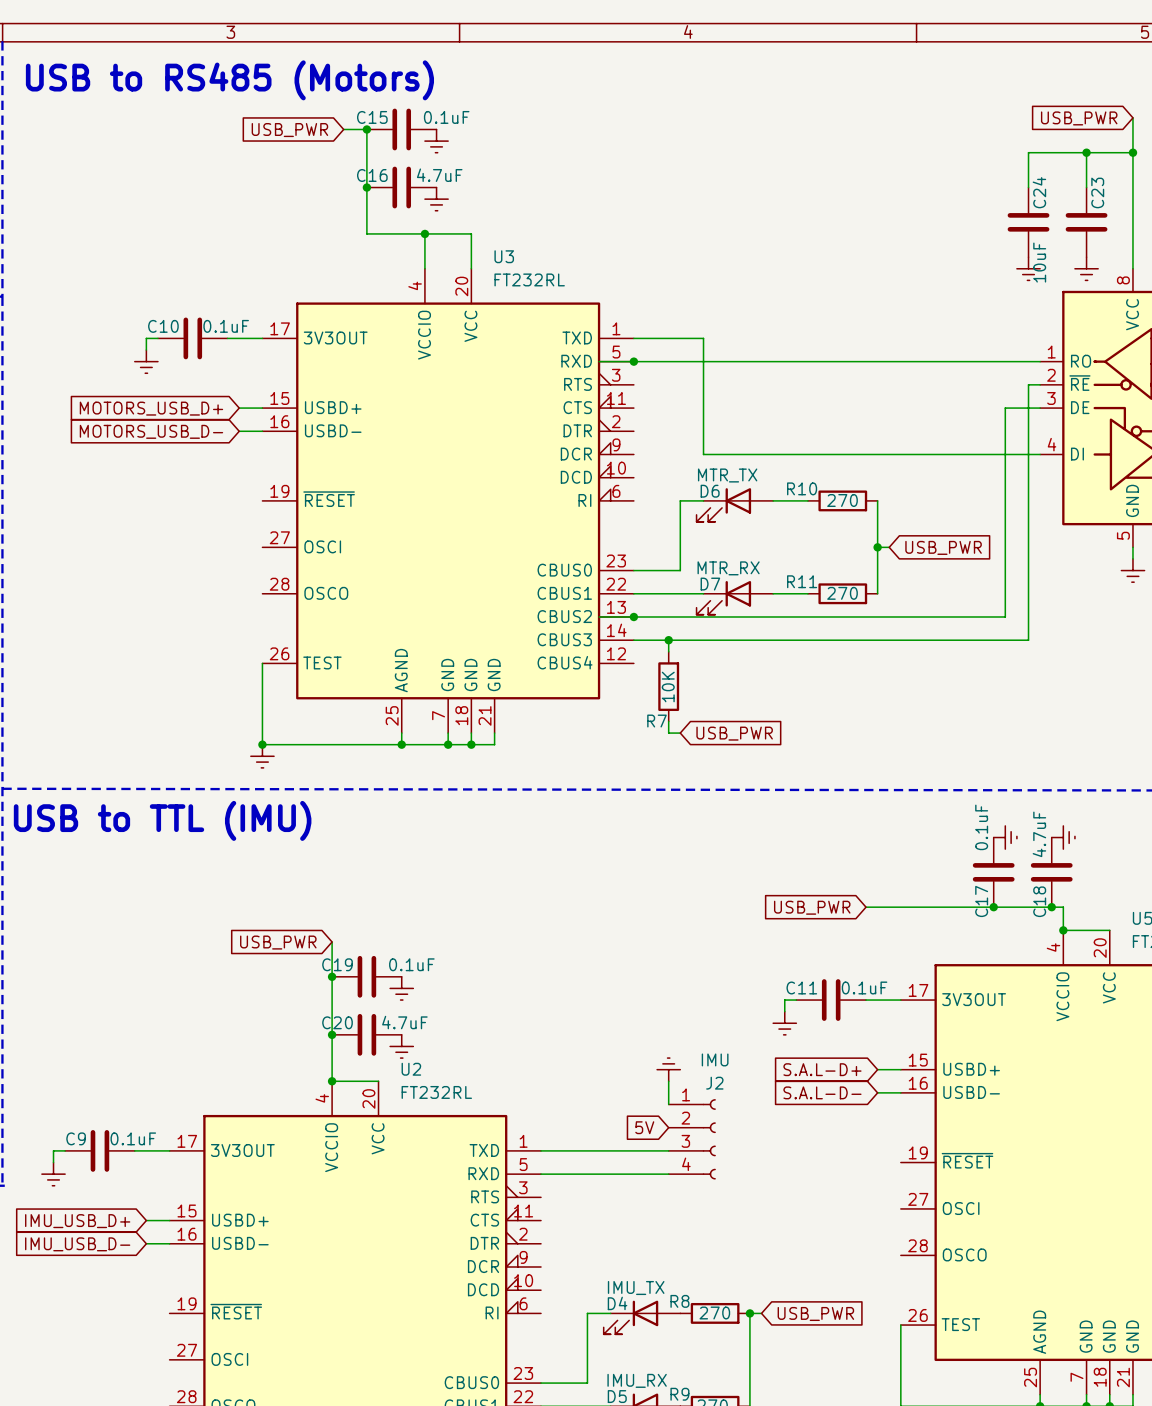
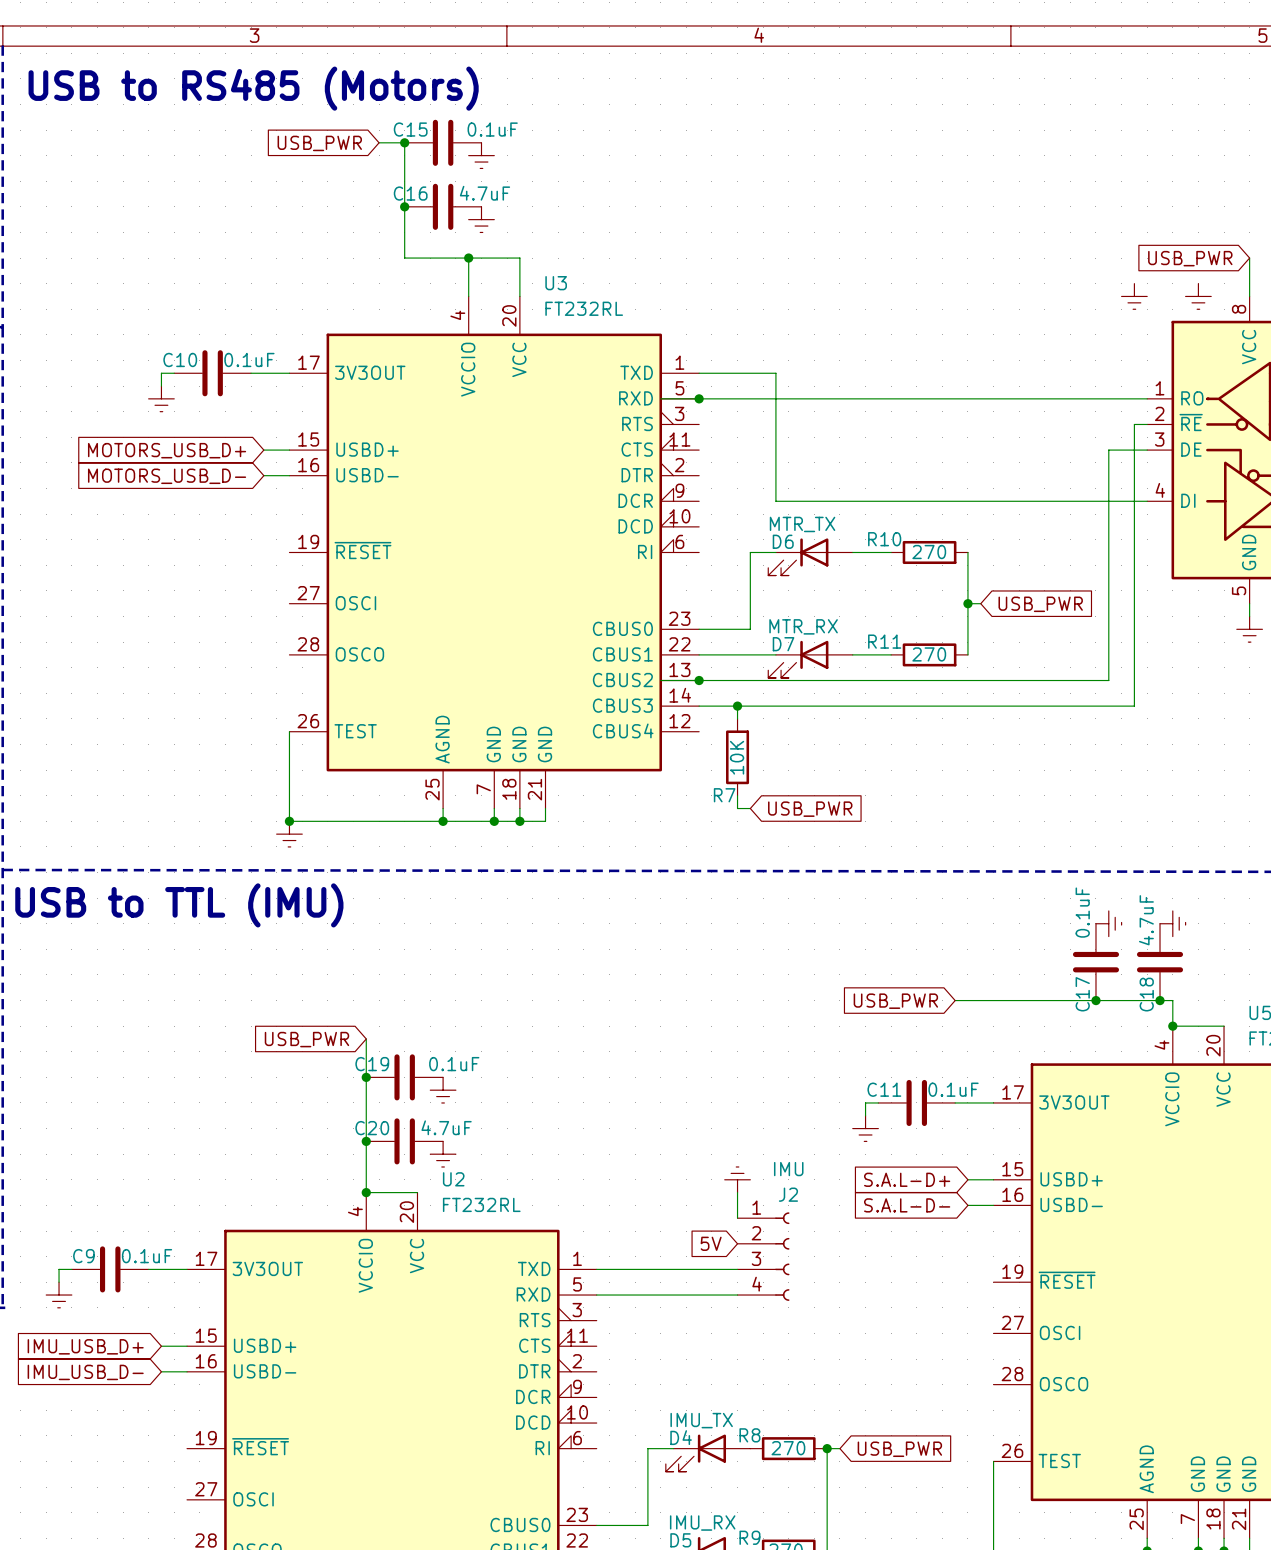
wire: (1132, 117) (1132, 233) -> none
global label position: USB_PWR (1079, 118) -> USB_PWR (1190, 258)
wire: (1086, 152) (1086, 187) -> none
junction: (1086, 152) -> none
wire: (1132, 152) (1028, 152) (1028, 187) -> none
junction: (1132, 152) -> none
C24: 10uF (1028, 222) -> none
C23: (1086, 222) -> none

